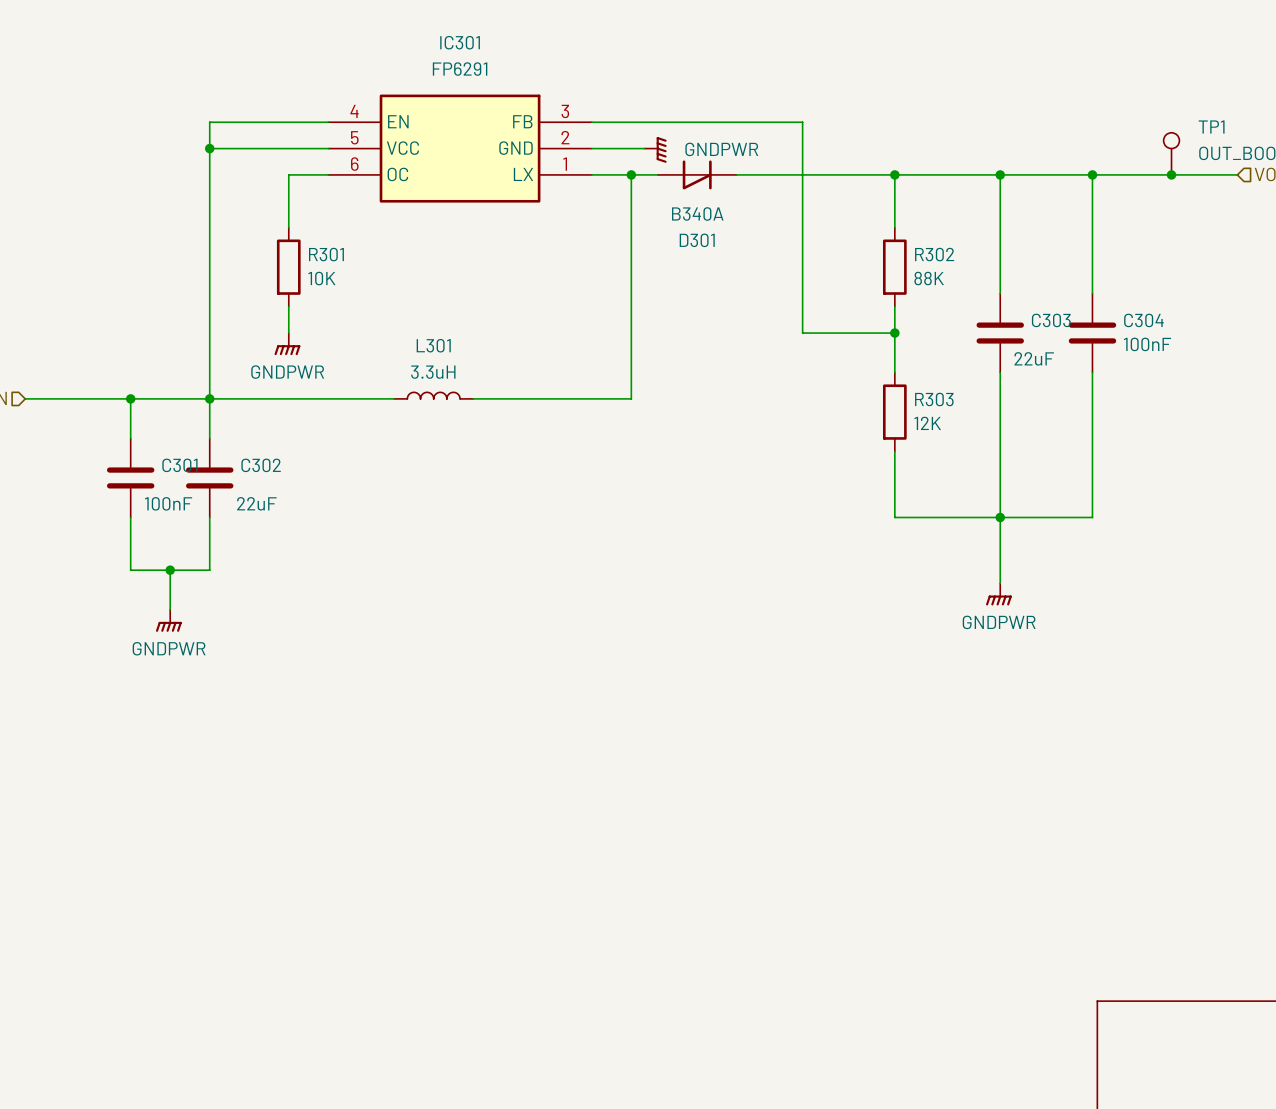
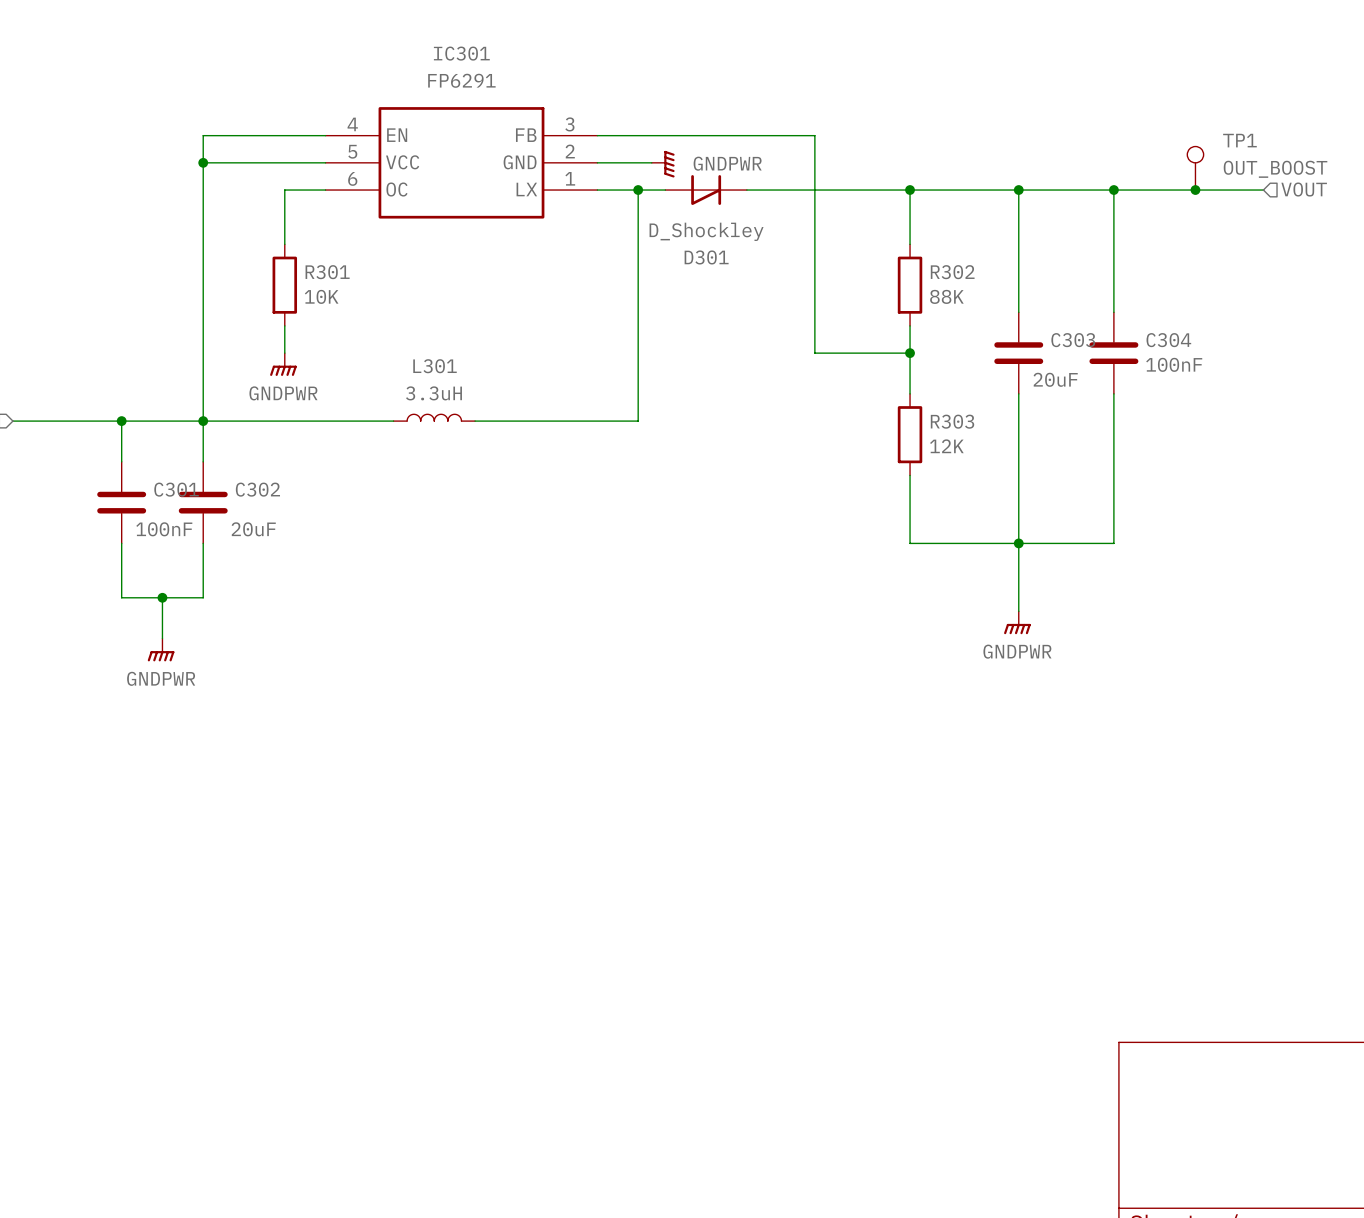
D301 value: B340A (697, 213) -> D_Shockley (706, 231)
C303 value: 22uF (1034, 358) -> 20uF (1055, 379)
C302 value: 22uF (256, 503) -> 20uF (253, 529)

